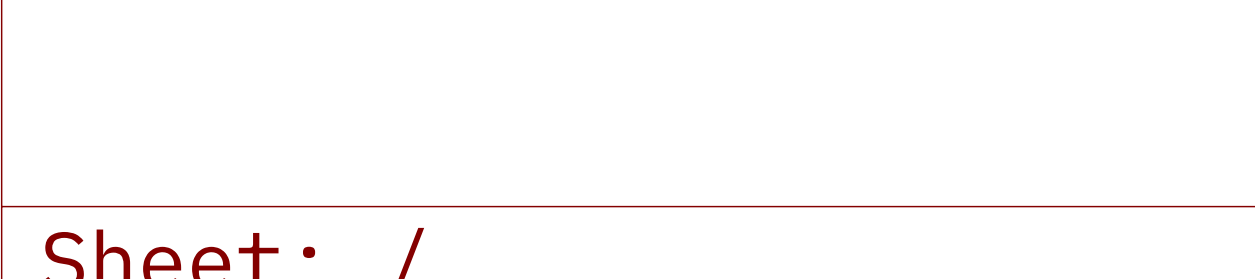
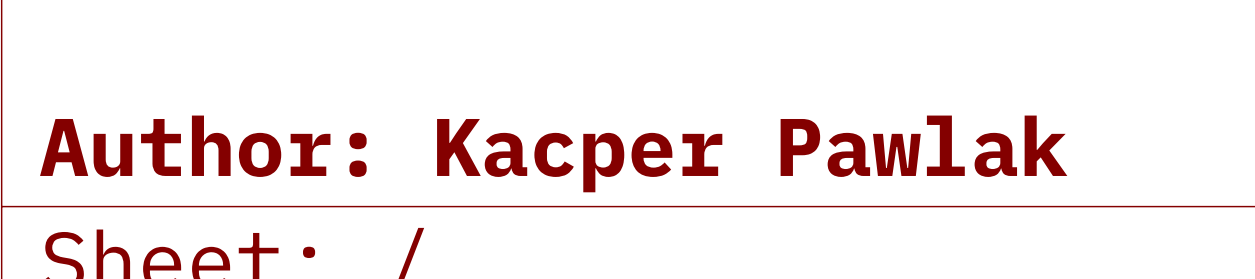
title block: none -> Author: Kacper Pawlak (553, 153)

